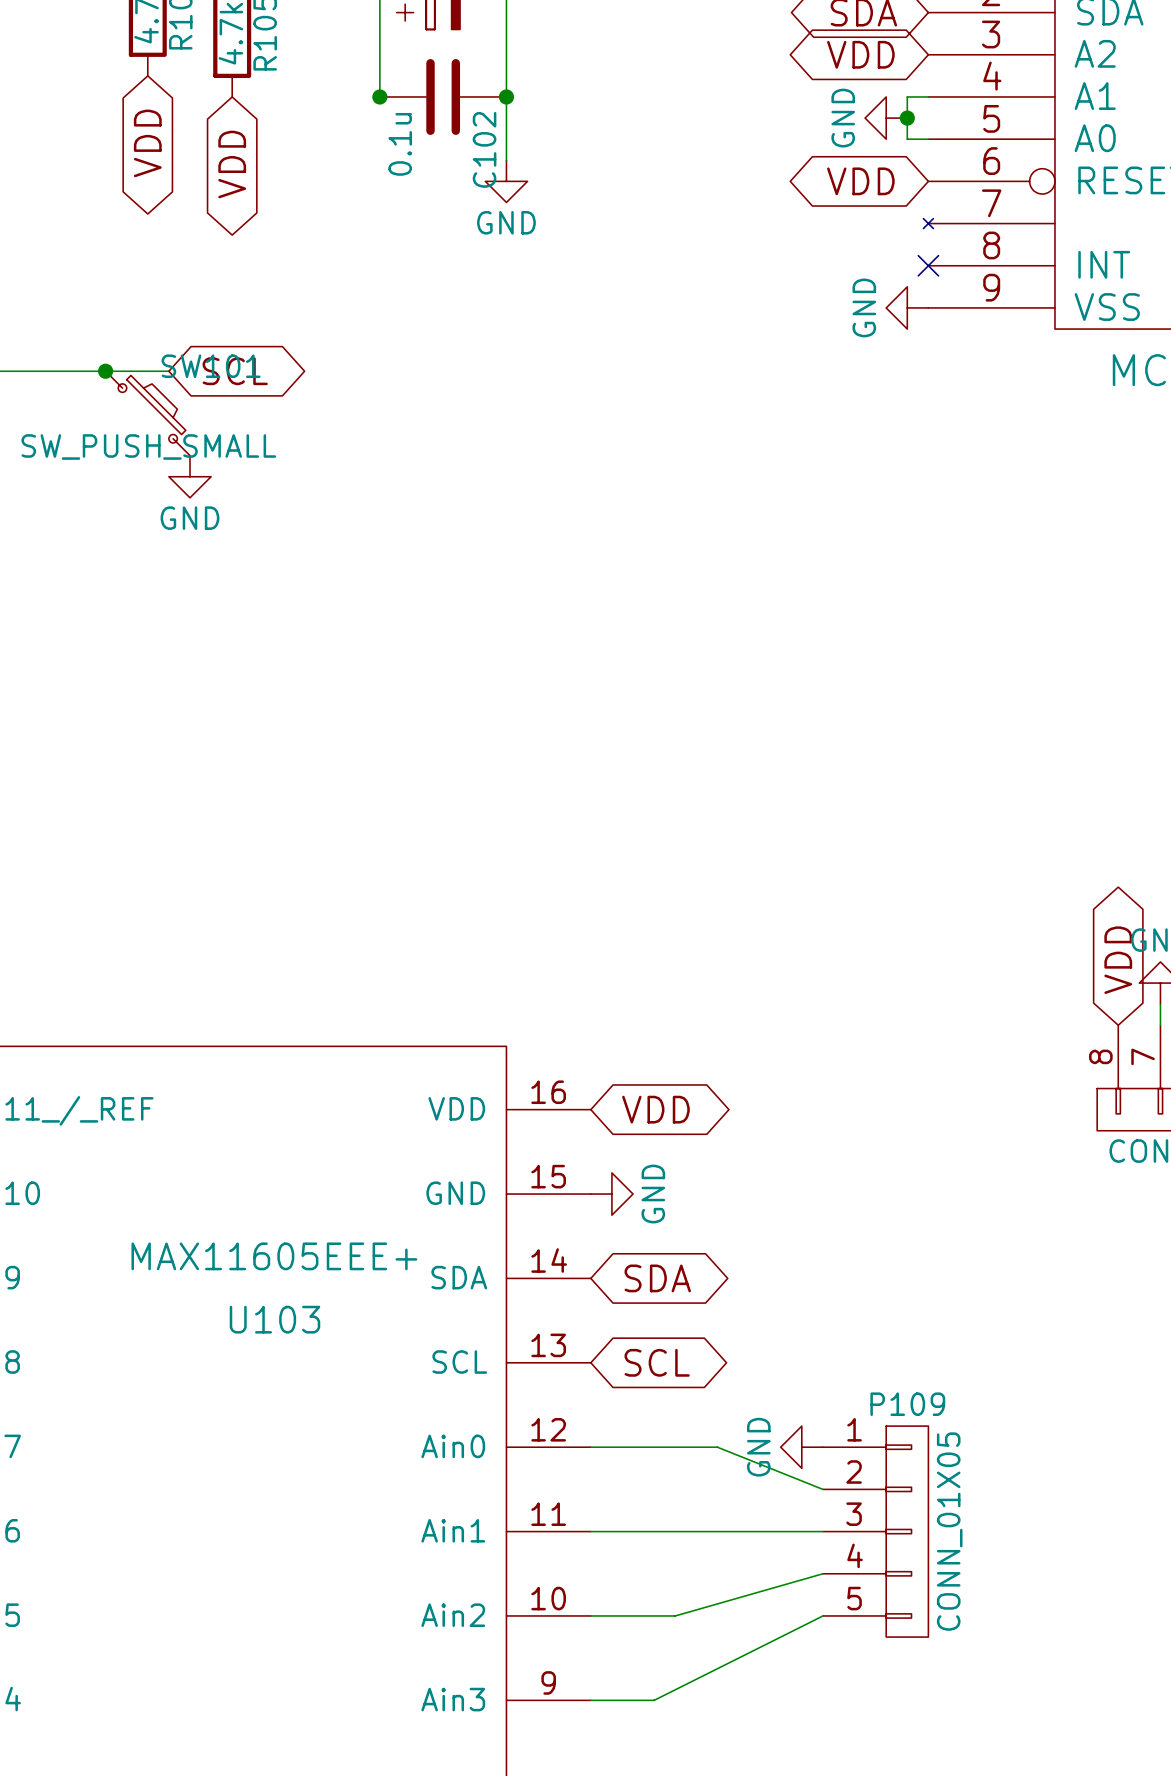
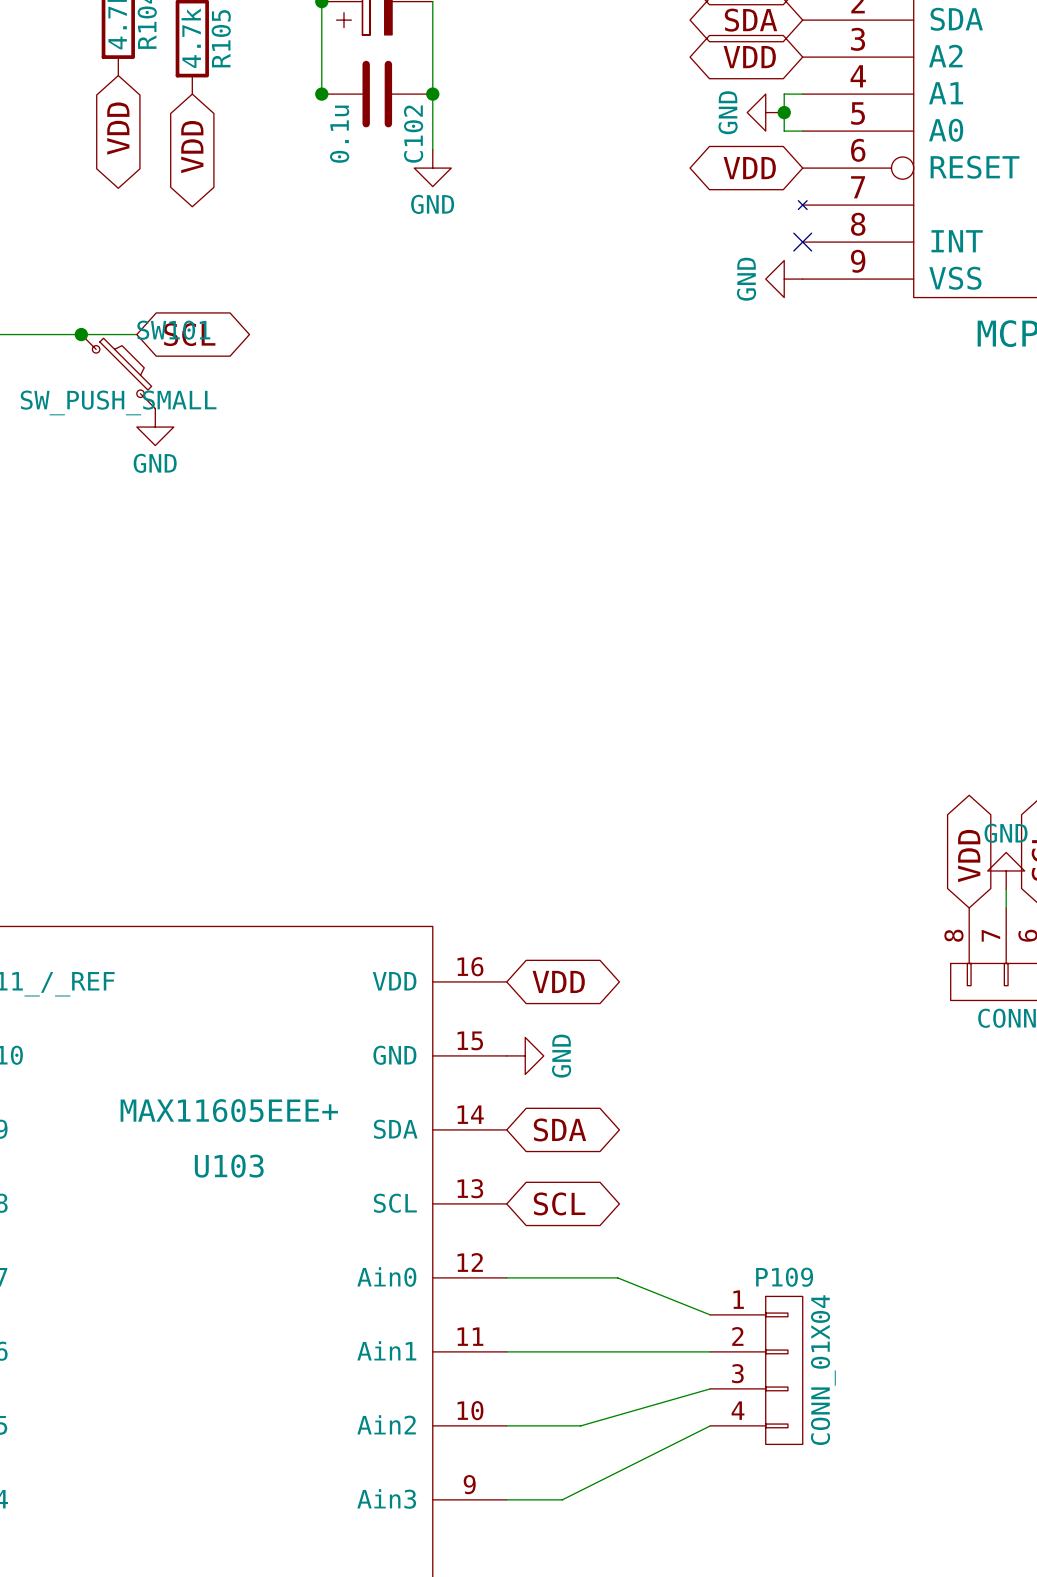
P109 symbol: [822, 1426, 929, 1638] -> [710, 1296, 803, 1445]
power symbol: GND (801, 1447) -> none
P109 value: CONN_01X05 (949, 1531) -> CONN_01X04 (823, 1370)

